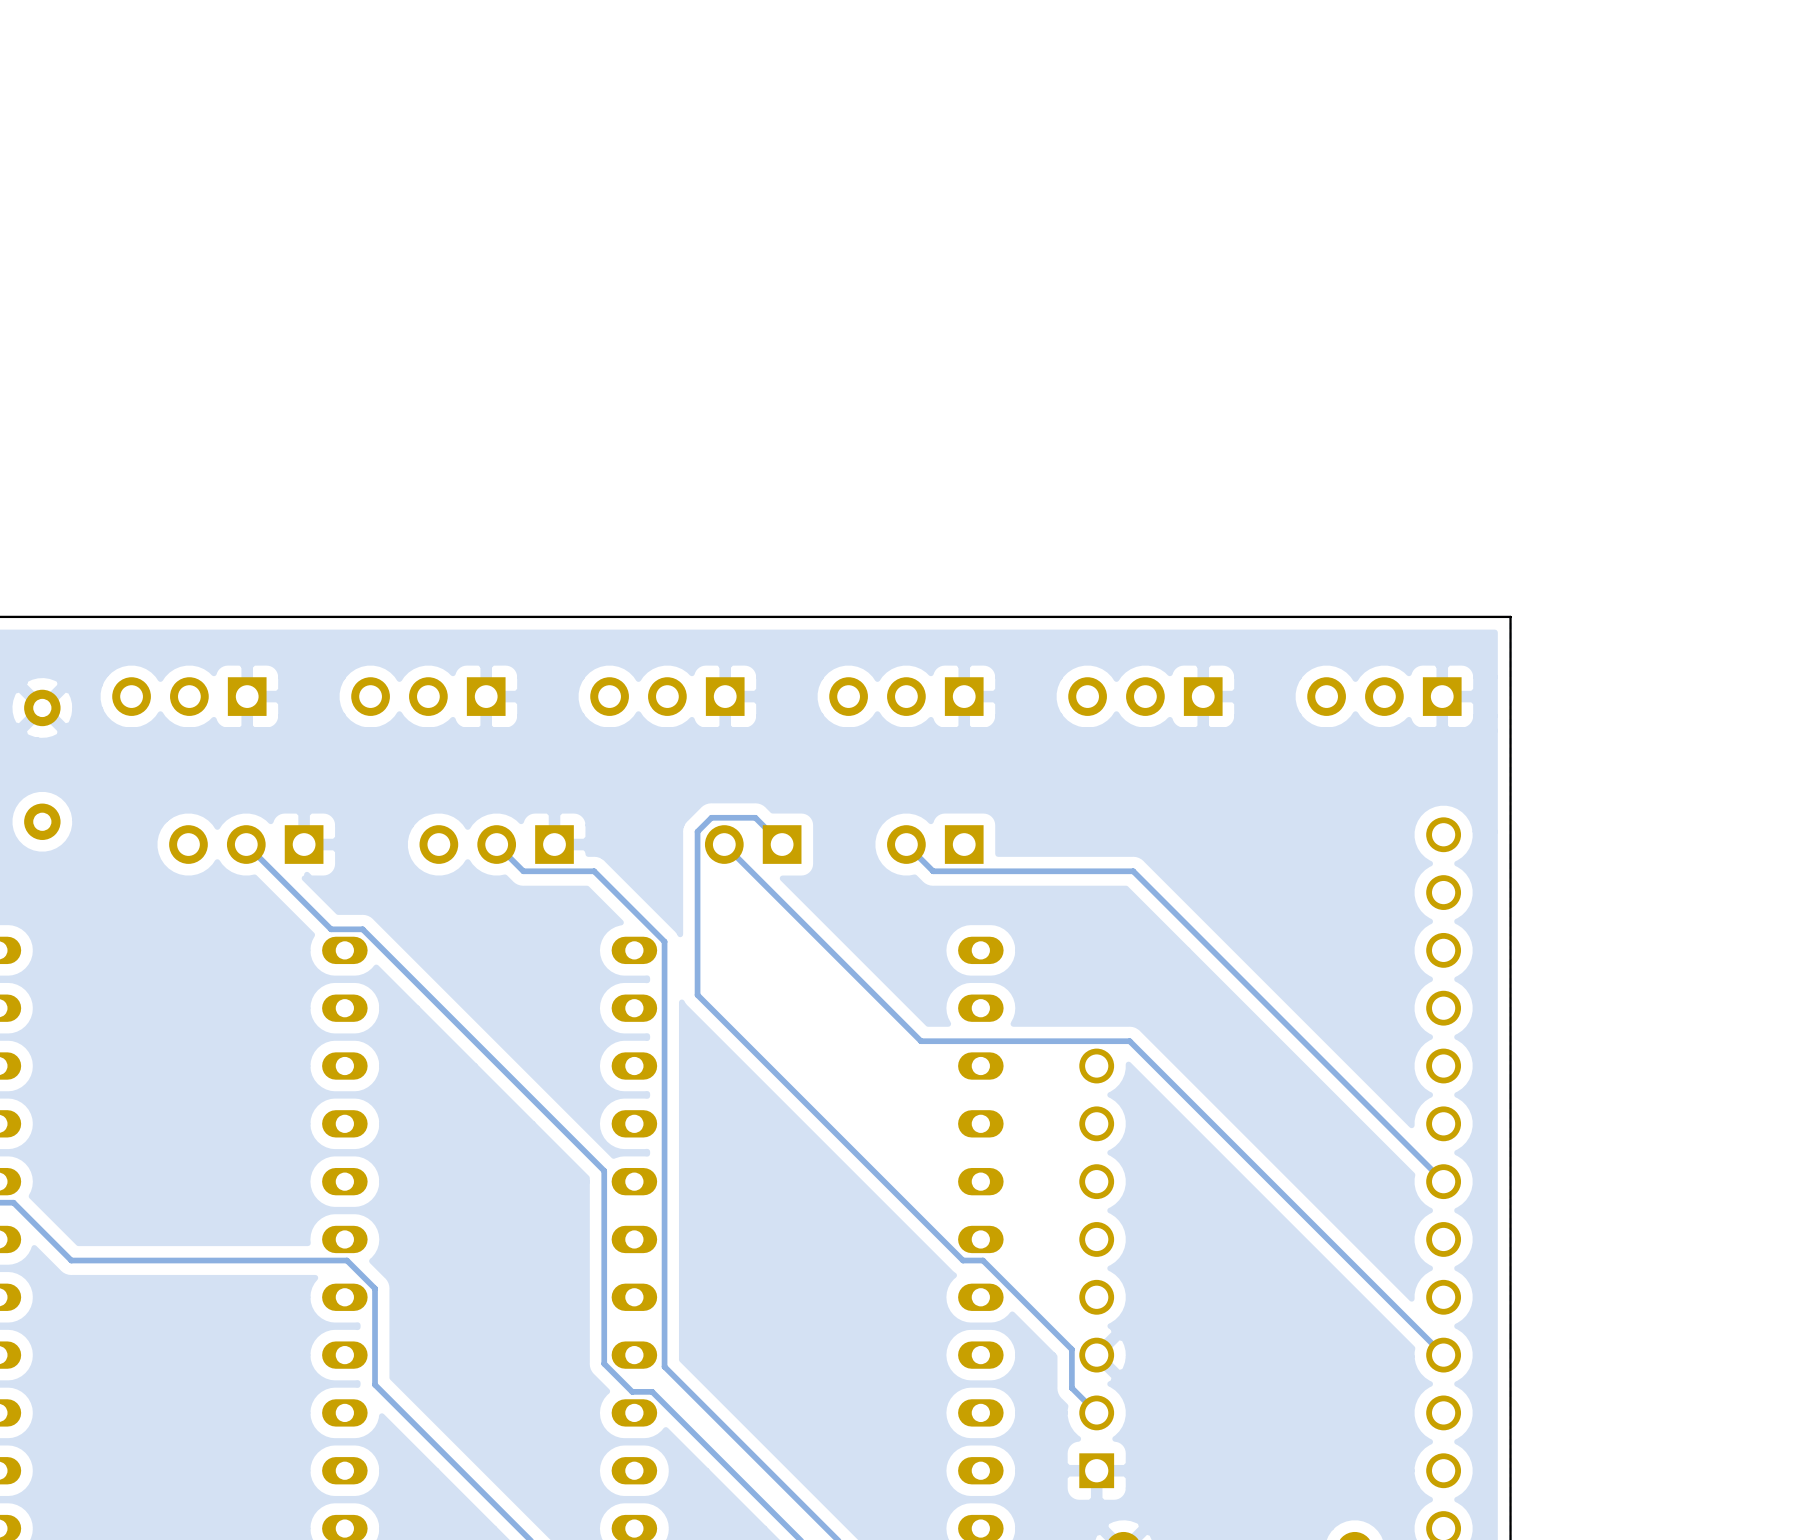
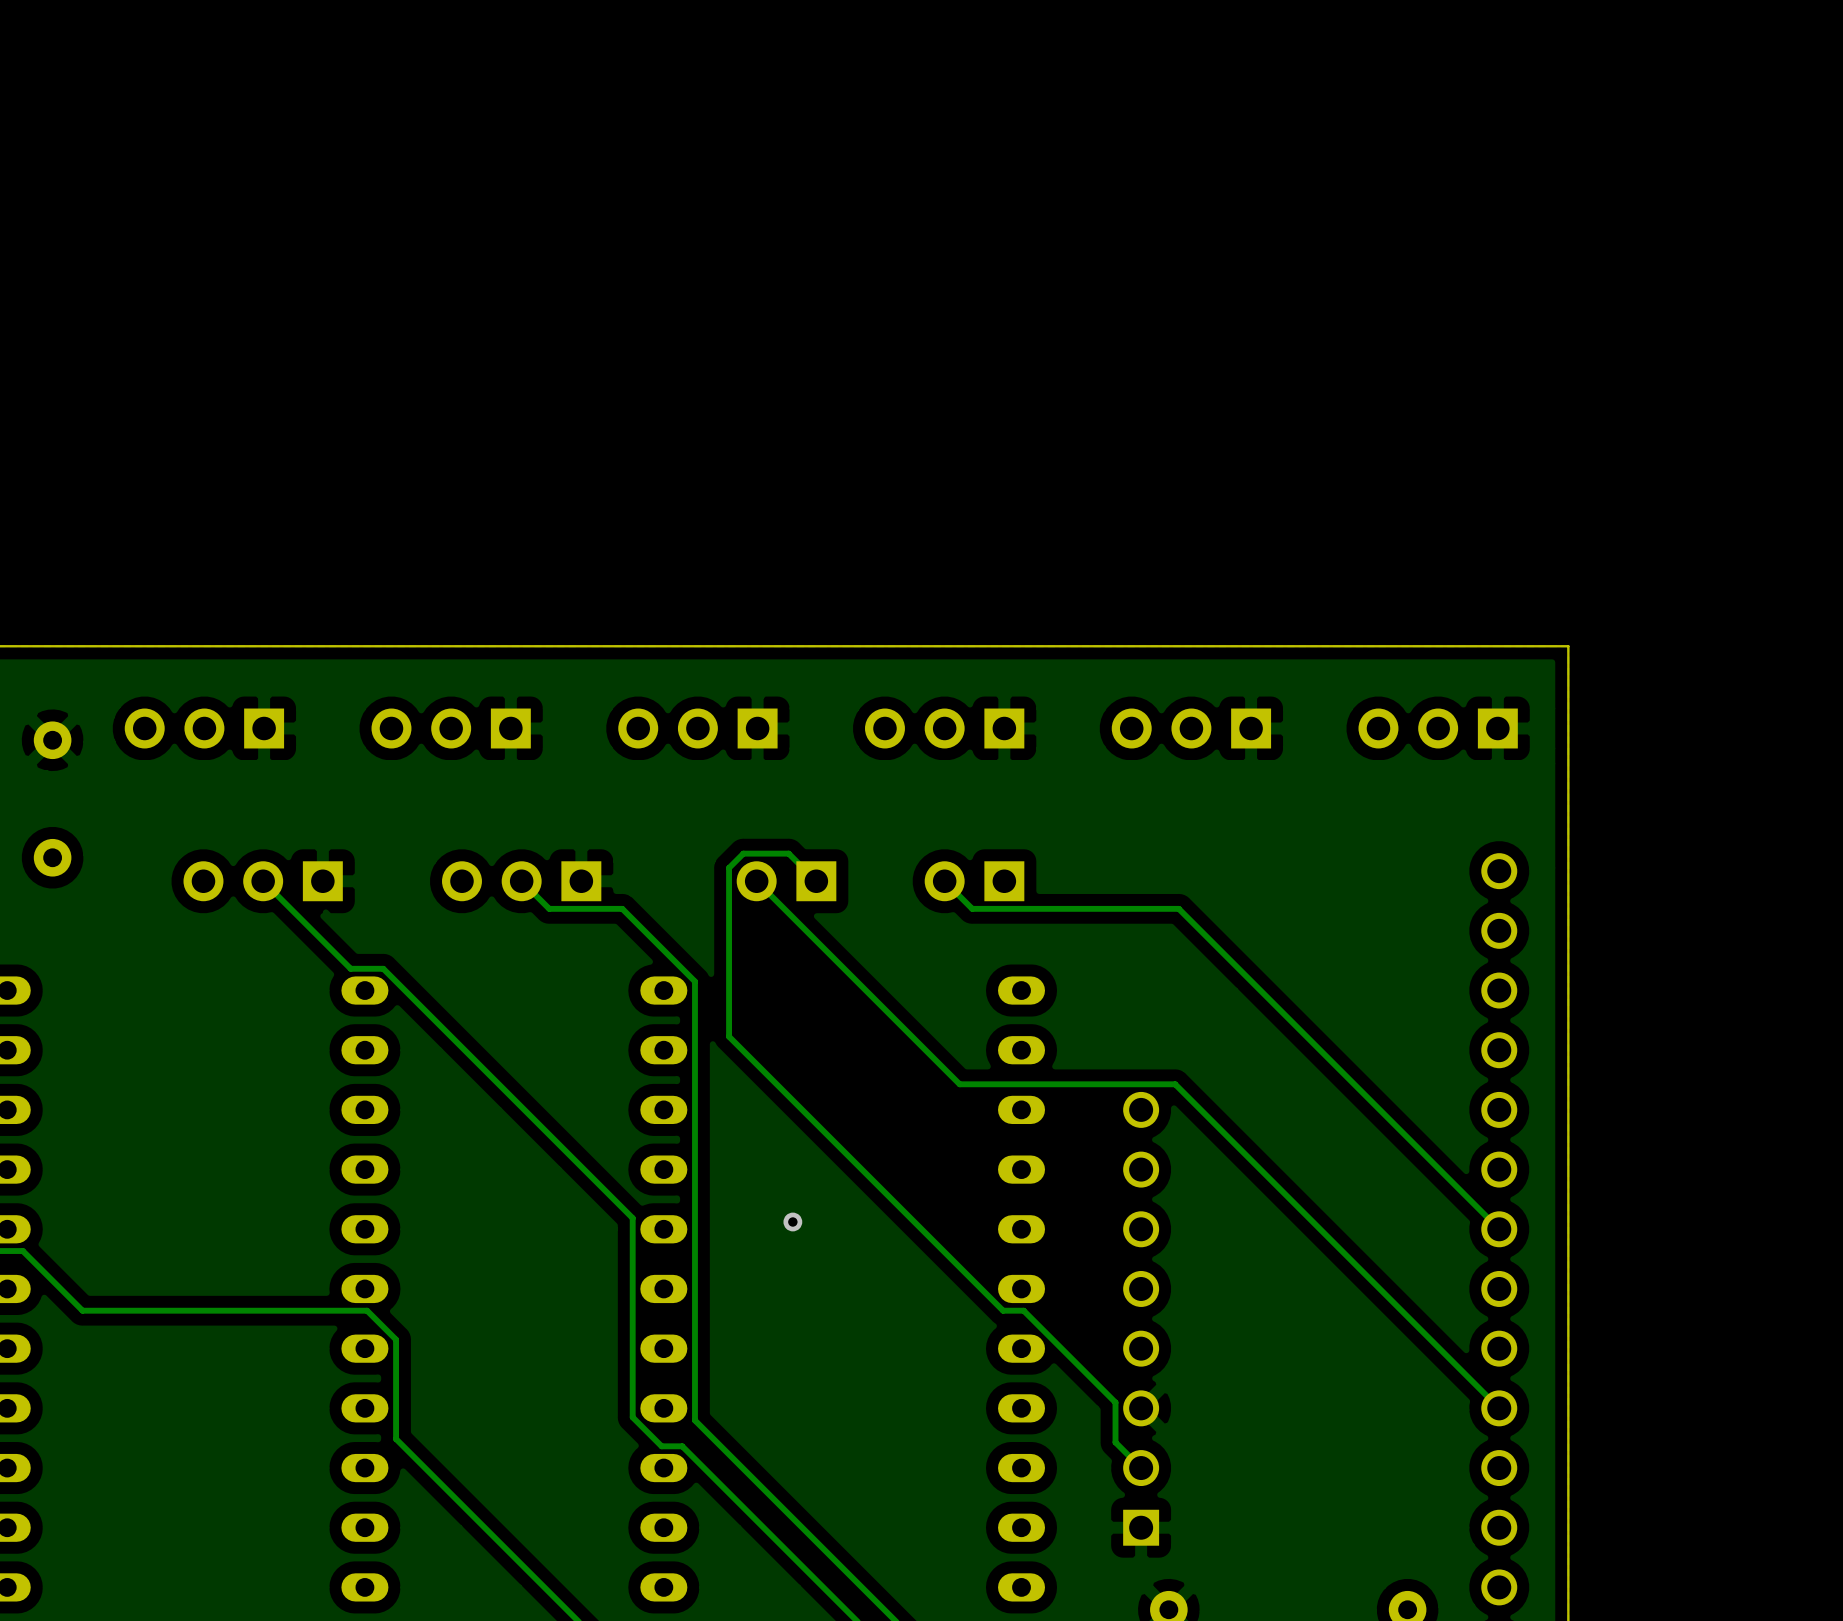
via: none -> (792, 1222)

